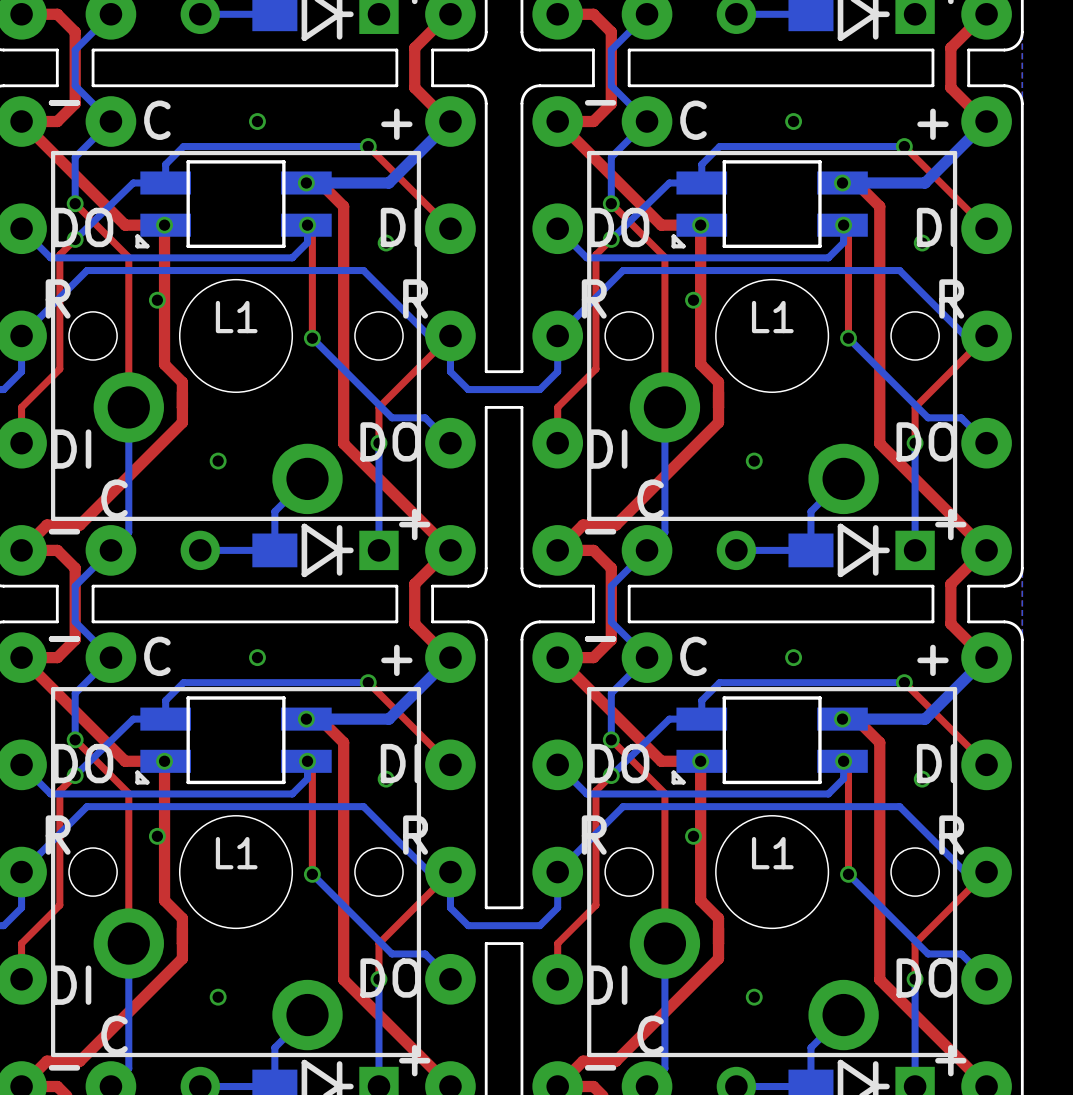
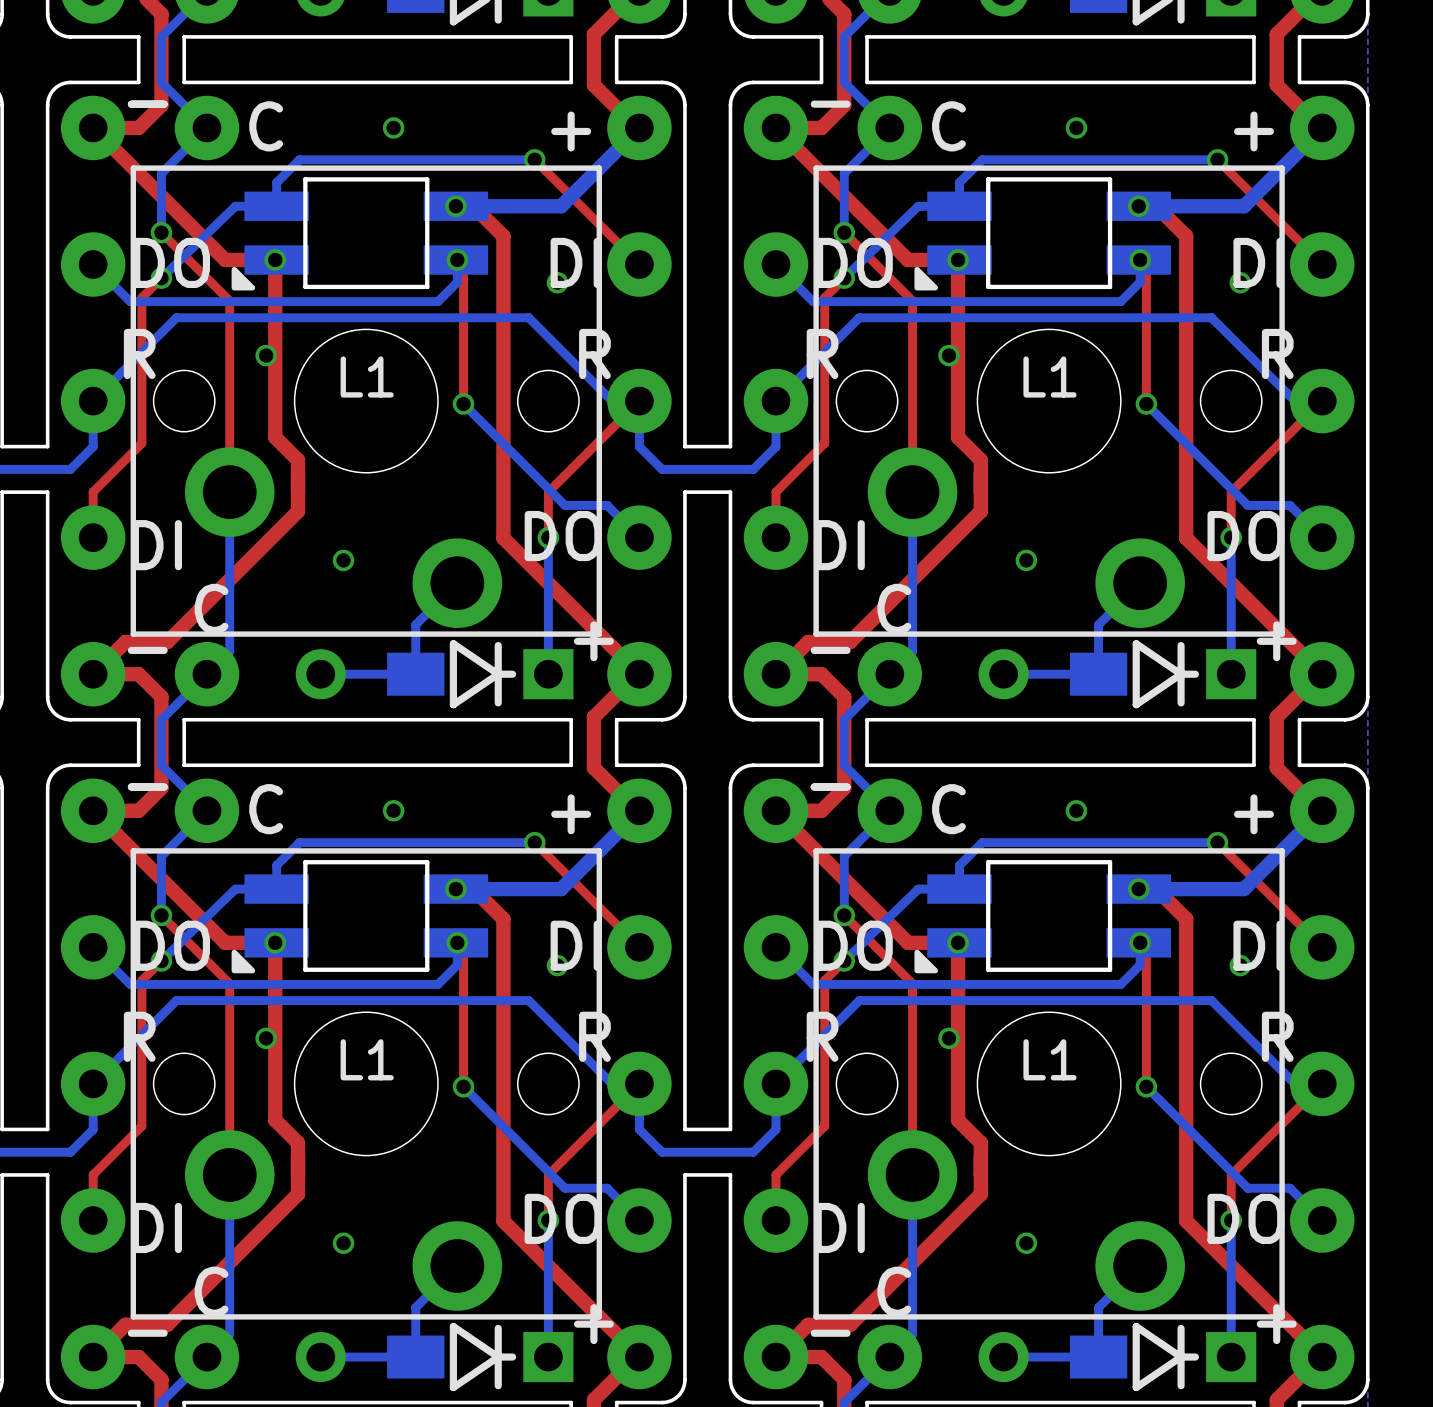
L1 footprint: [135, 160, 332, 249] -> [231, 177, 489, 291]
L1 footprint: [671, 160, 868, 249] -> [914, 177, 1171, 291]
L1 footprint: [135, 696, 332, 785] -> [231, 860, 489, 974]
L1 footprint: [671, 696, 868, 785] -> [914, 860, 1171, 974]

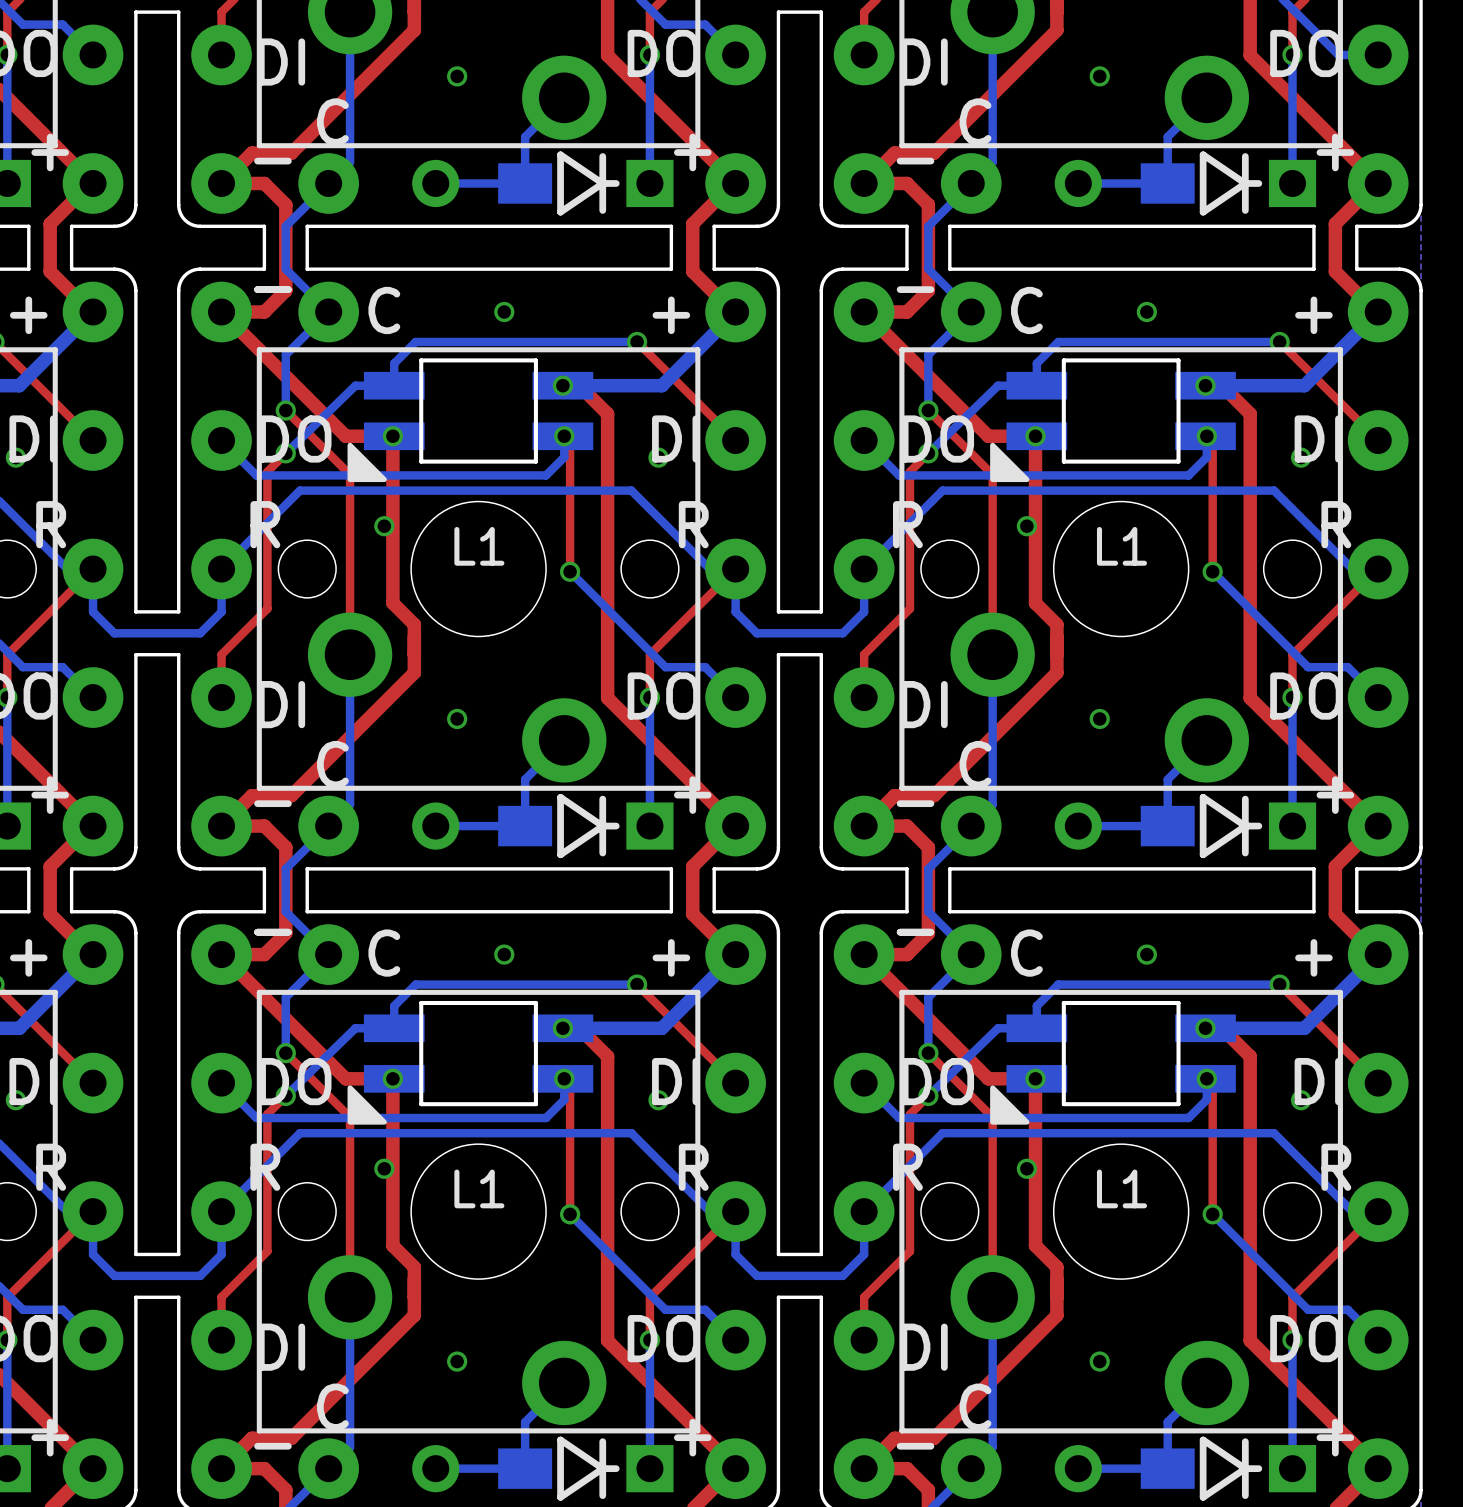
L1 footprint: [231, 177, 489, 291] -> [347, 358, 594, 483]
L1 footprint: [914, 177, 1171, 291] -> [990, 358, 1236, 483]
L1 footprint: [231, 860, 489, 974] -> [347, 1000, 594, 1125]
L1 footprint: [914, 860, 1171, 974] -> [990, 1000, 1236, 1125]

